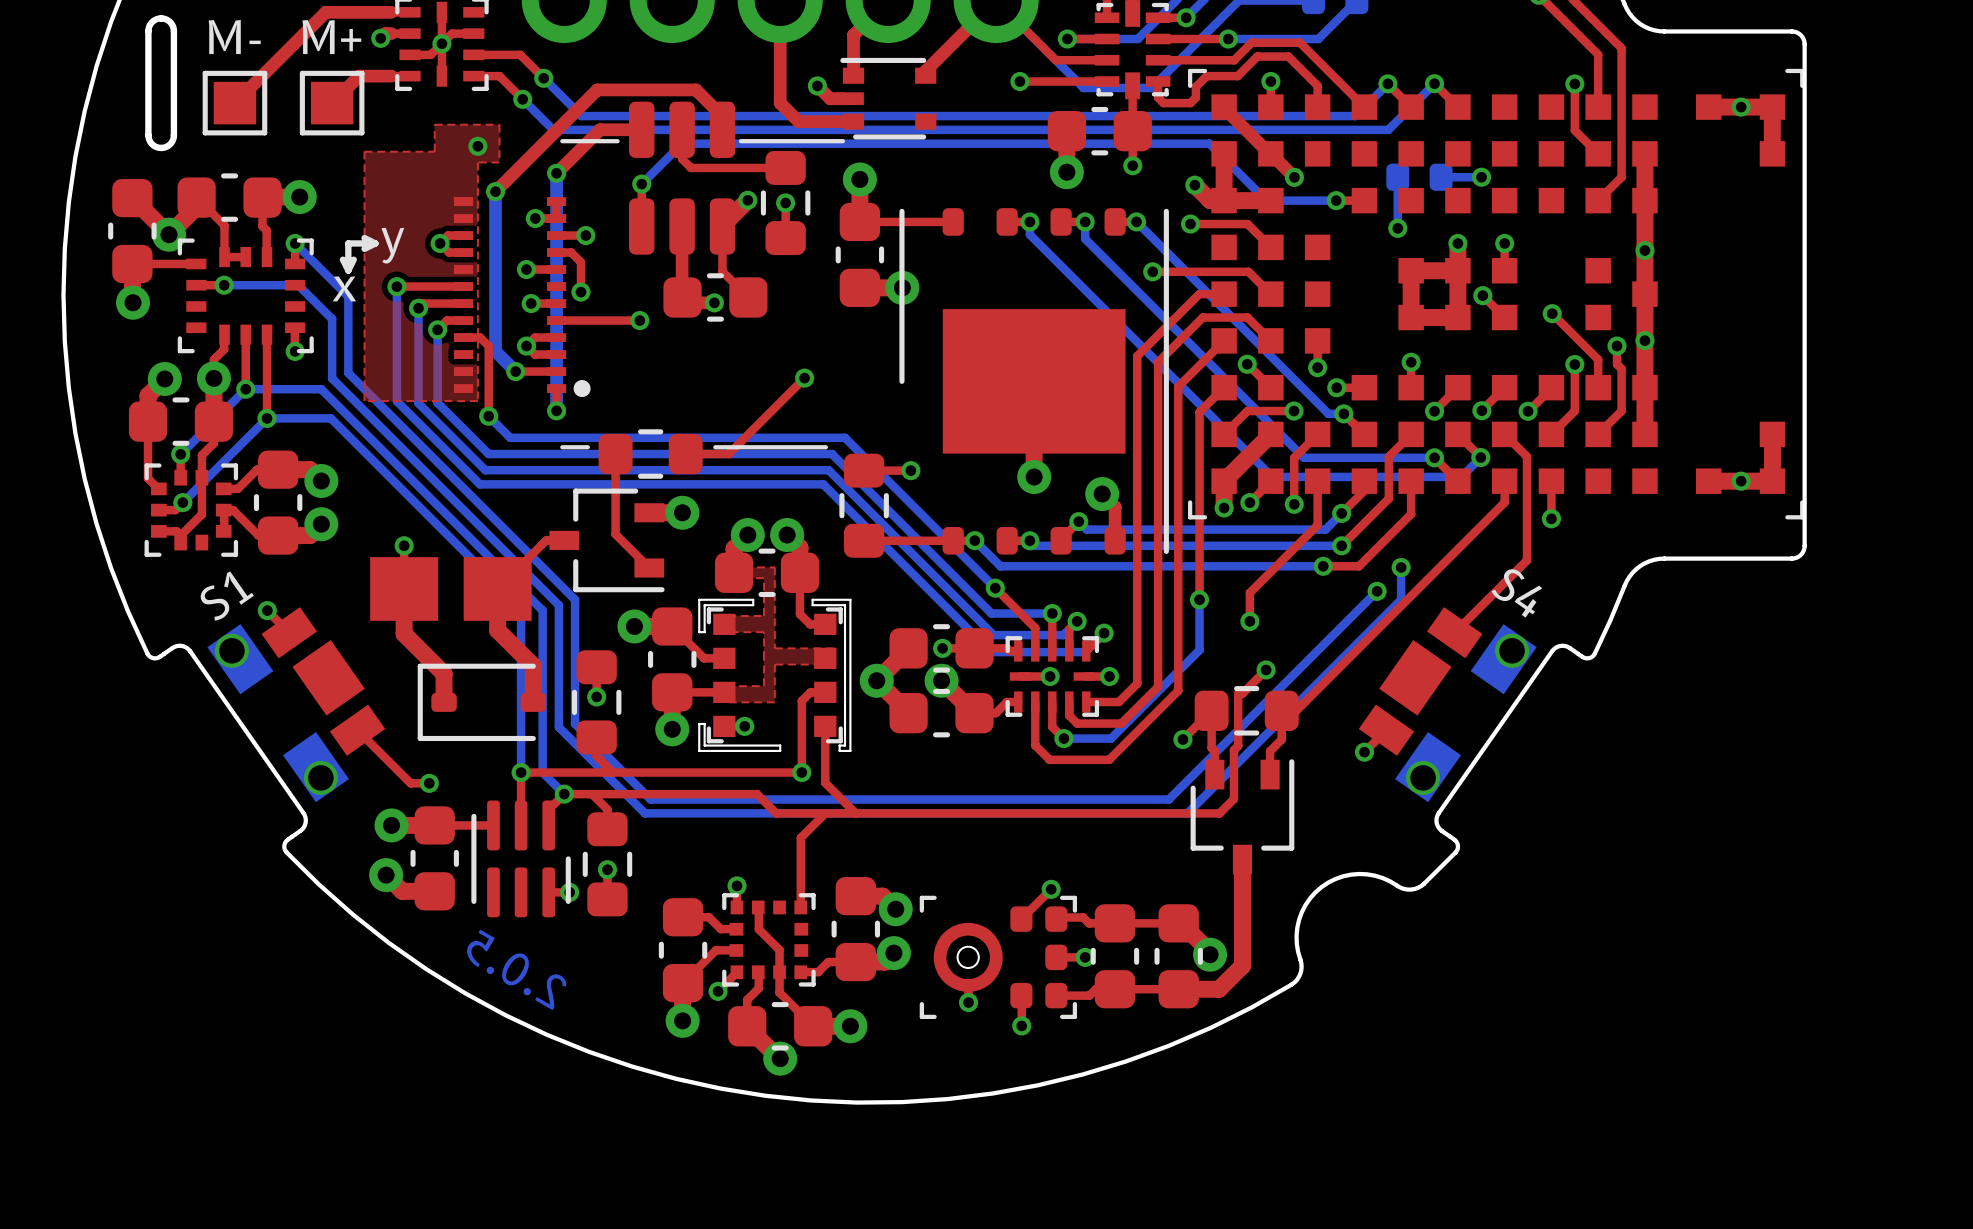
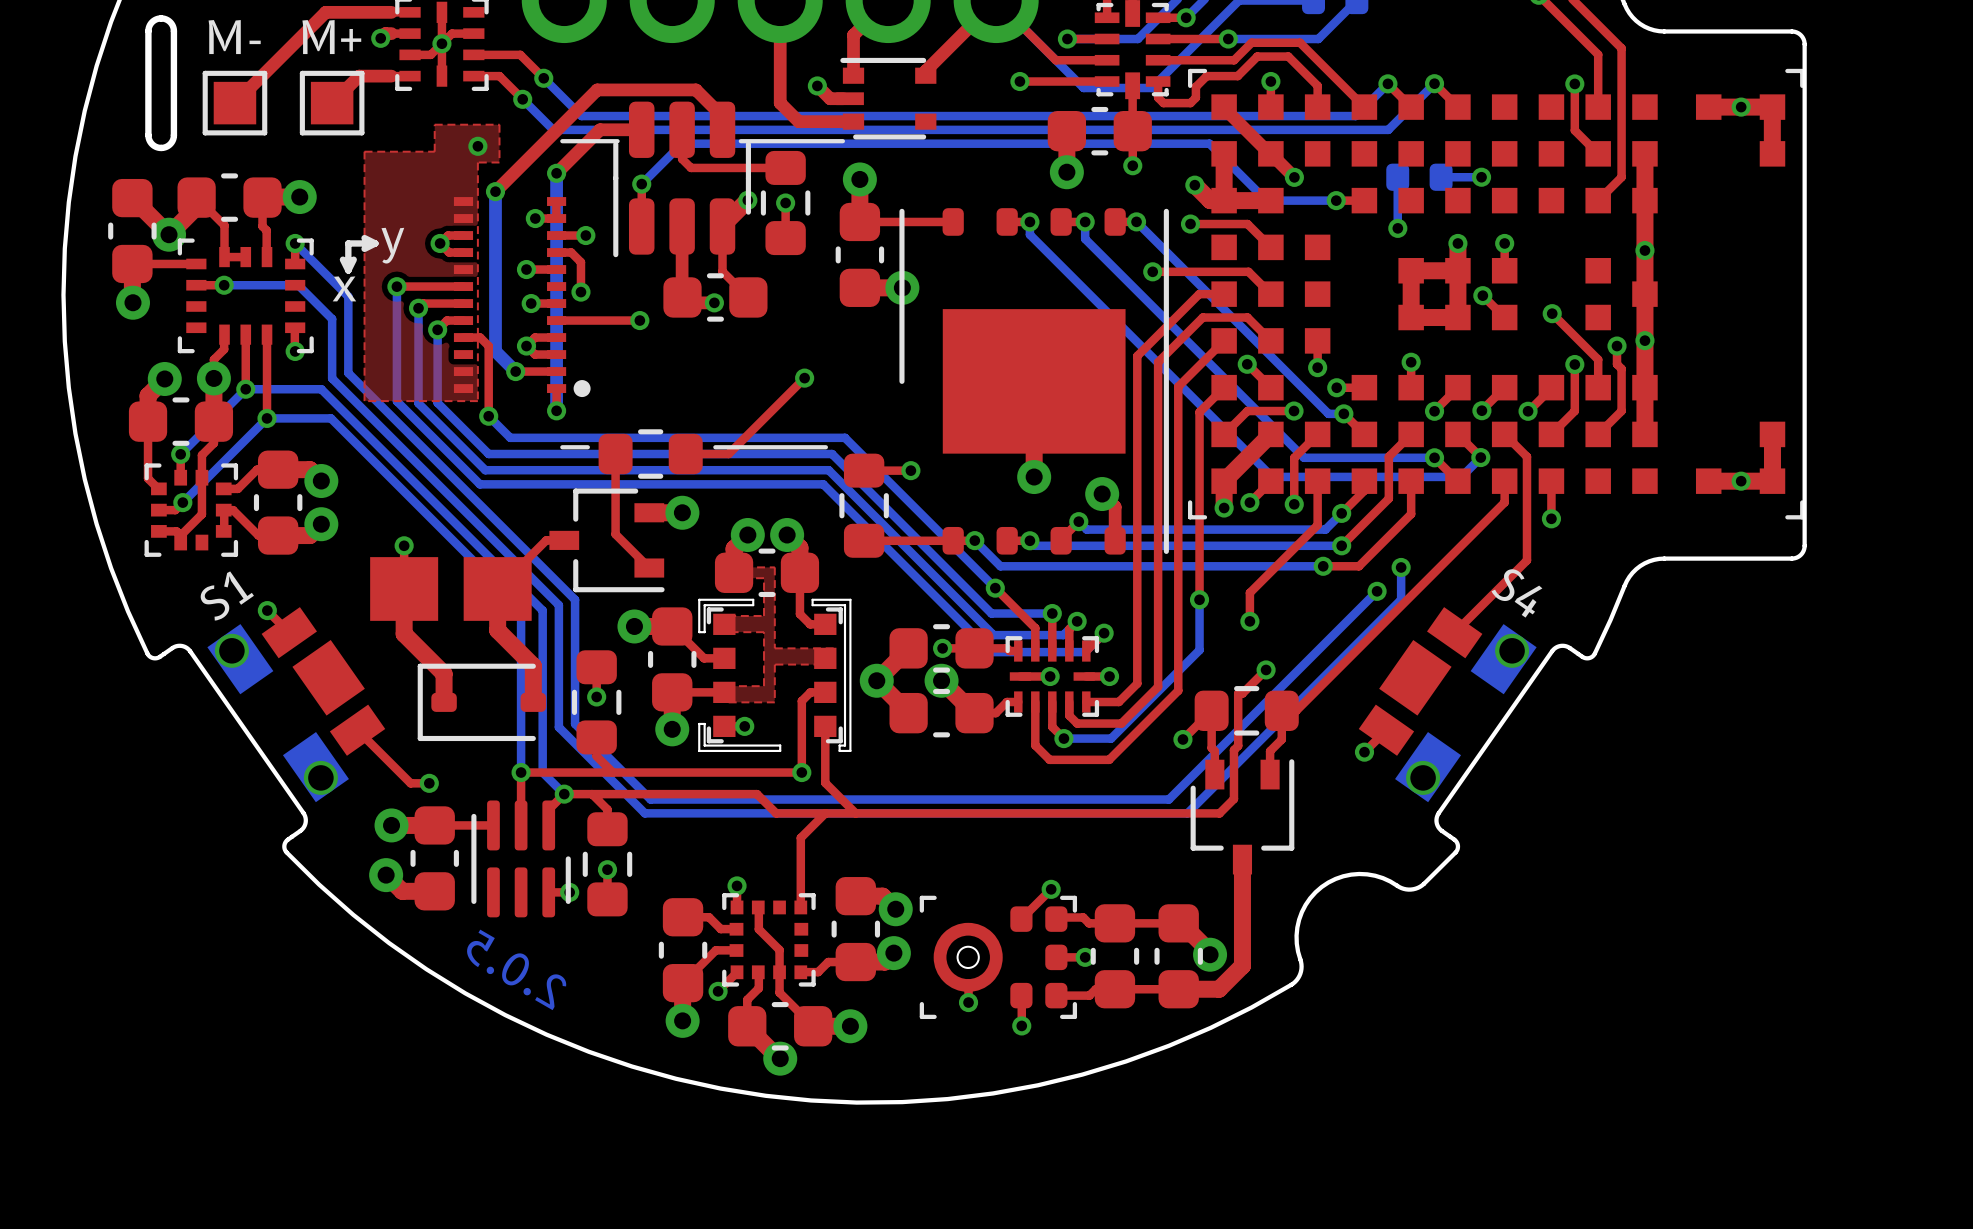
part footprint: [628, 101, 736, 255] -> [613, 101, 751, 258]

